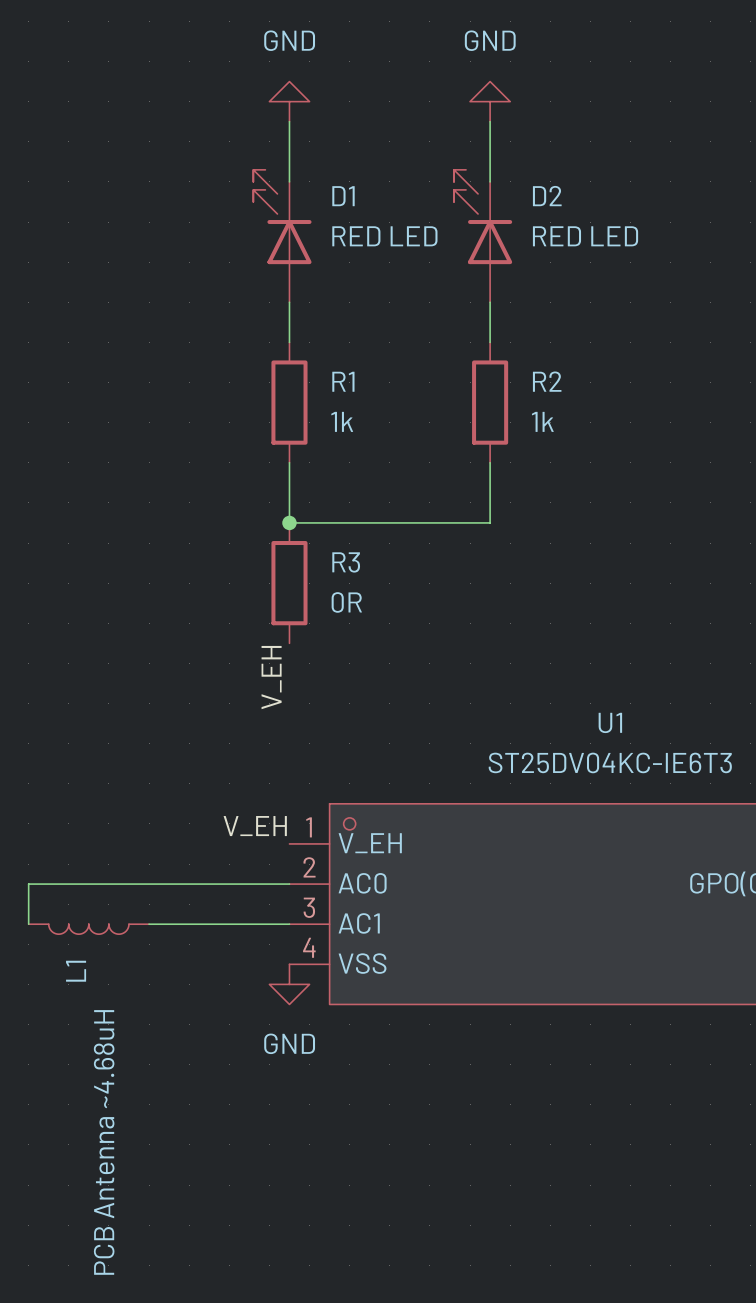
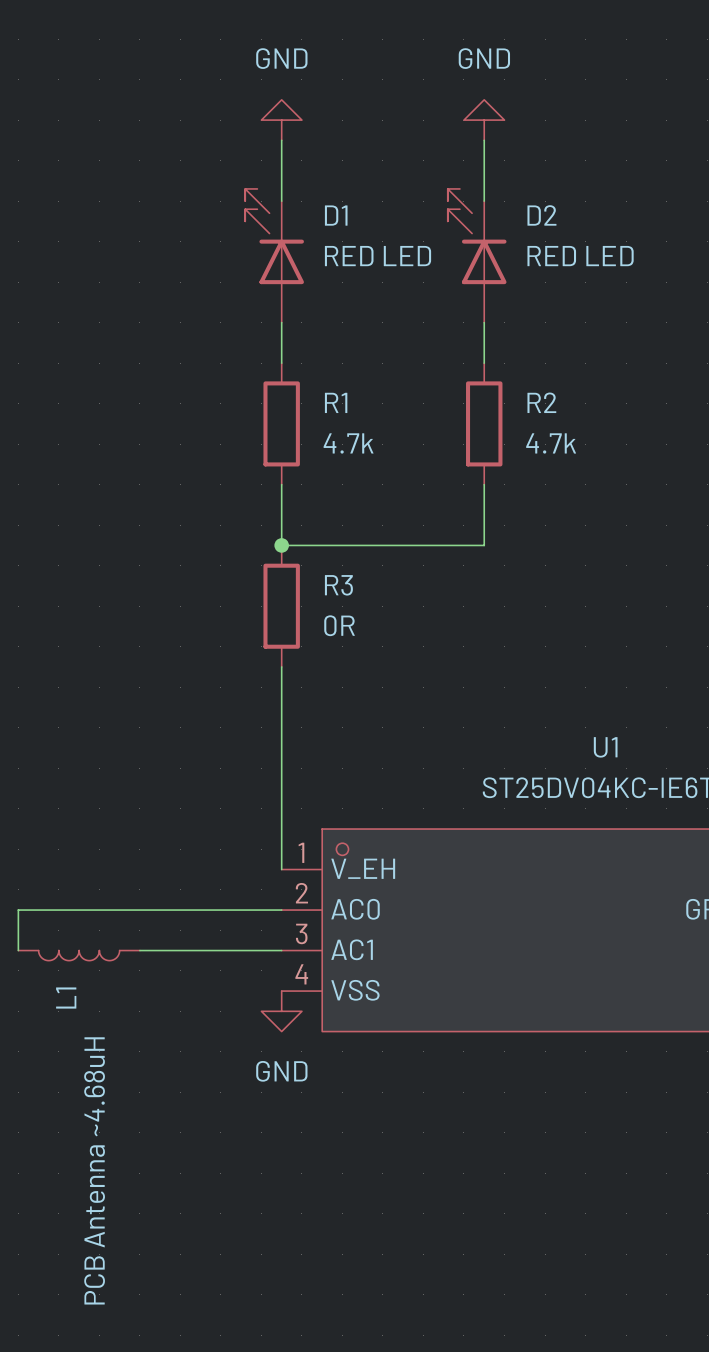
R1 value: 1k (342, 421) -> 4.7k (348, 443)
R2 value: 1k (542, 421) -> 4.7k (551, 443)
wire: none -> (281, 666) (281, 869)
label: V_EH (271, 677) -> none
label: V_EH (255, 826) -> none

